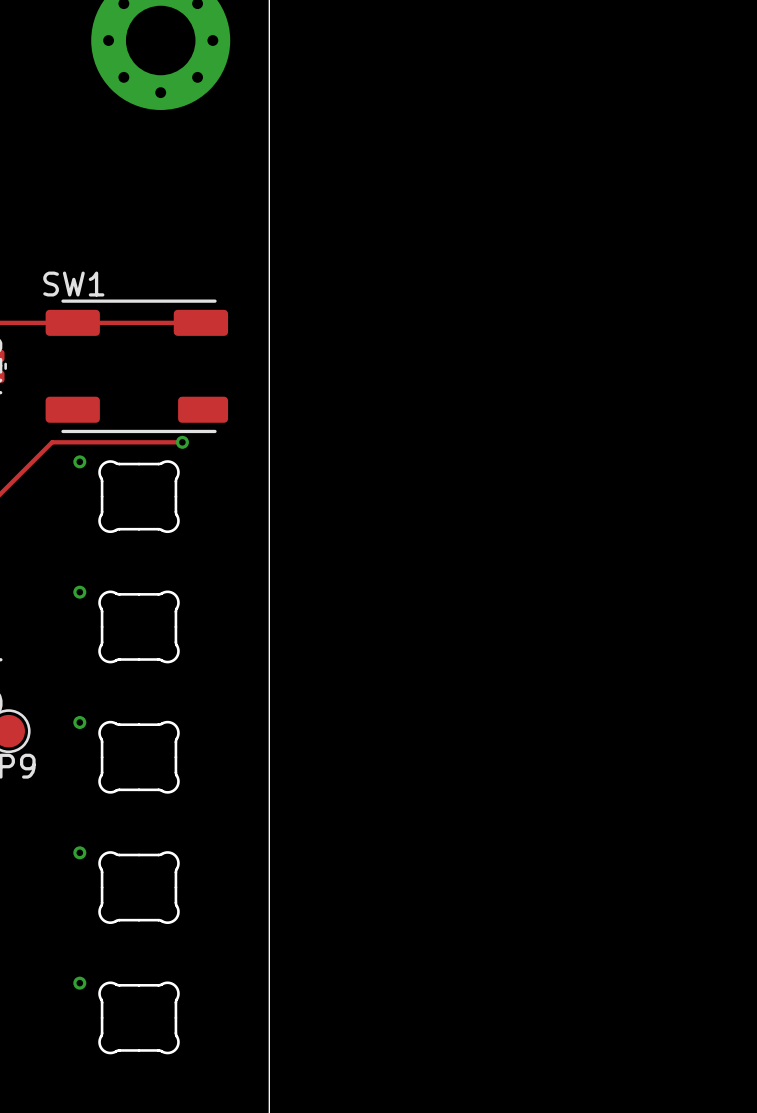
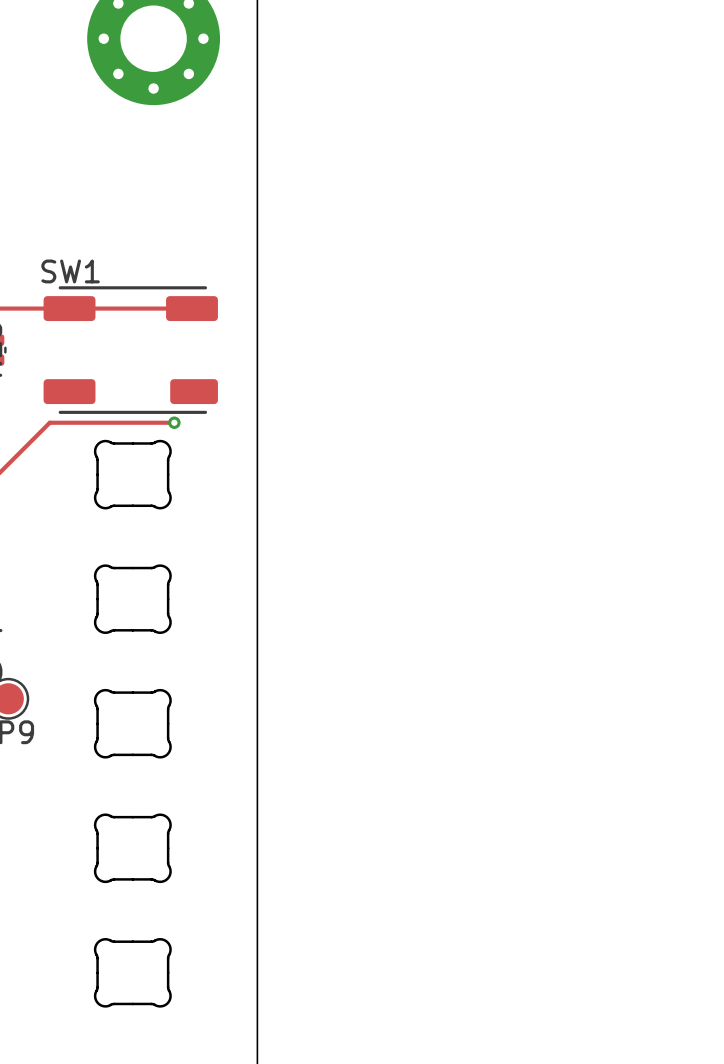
via: (79, 461) -> none
via: (79, 592) -> none
via: (79, 722) -> none
via: (79, 852) -> none
via: (79, 983) -> none

